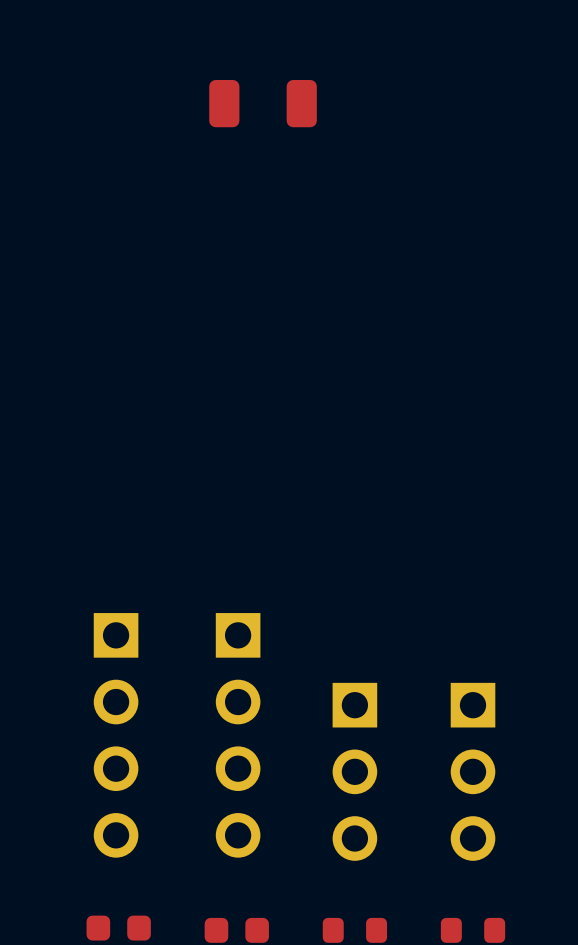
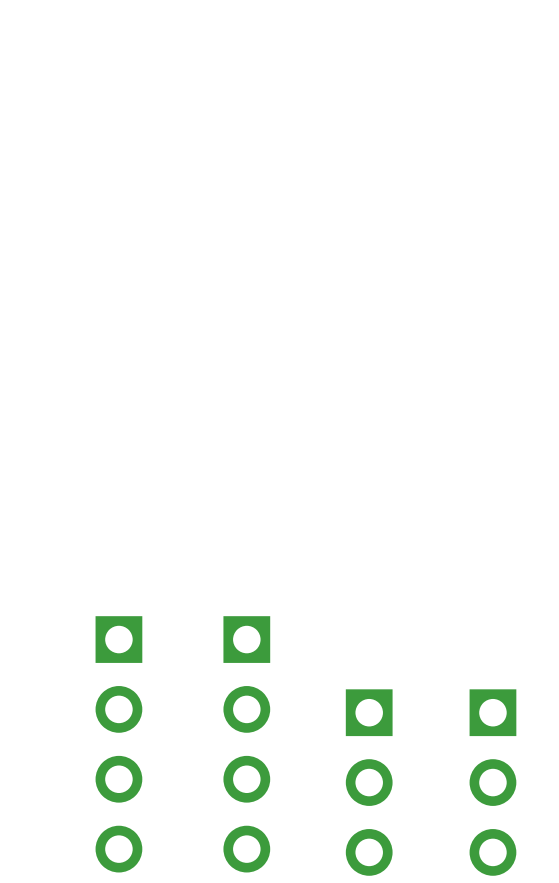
part: (263, 103) -> none

